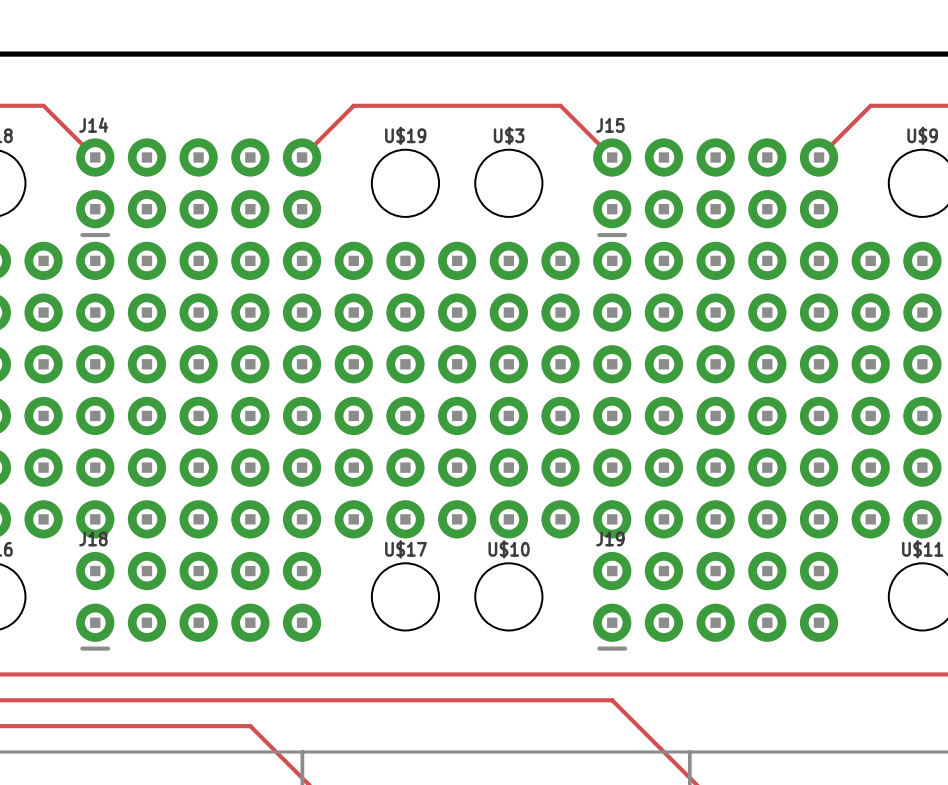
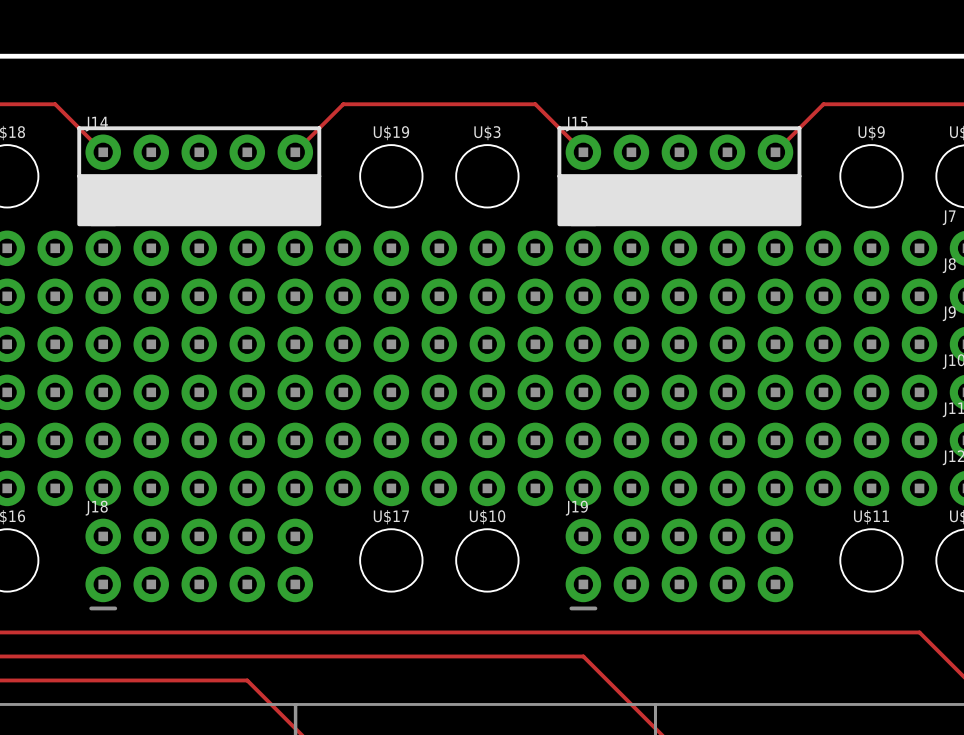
line: none -> (79, 128) (319, 128) (319, 176) (79, 176) (79, 128)
line: none -> (559, 128) (799, 128) (799, 176) (559, 176) (559, 128)
drawing: none -> [77, 174, 322, 227]
drawing: none -> [557, 174, 802, 227]

